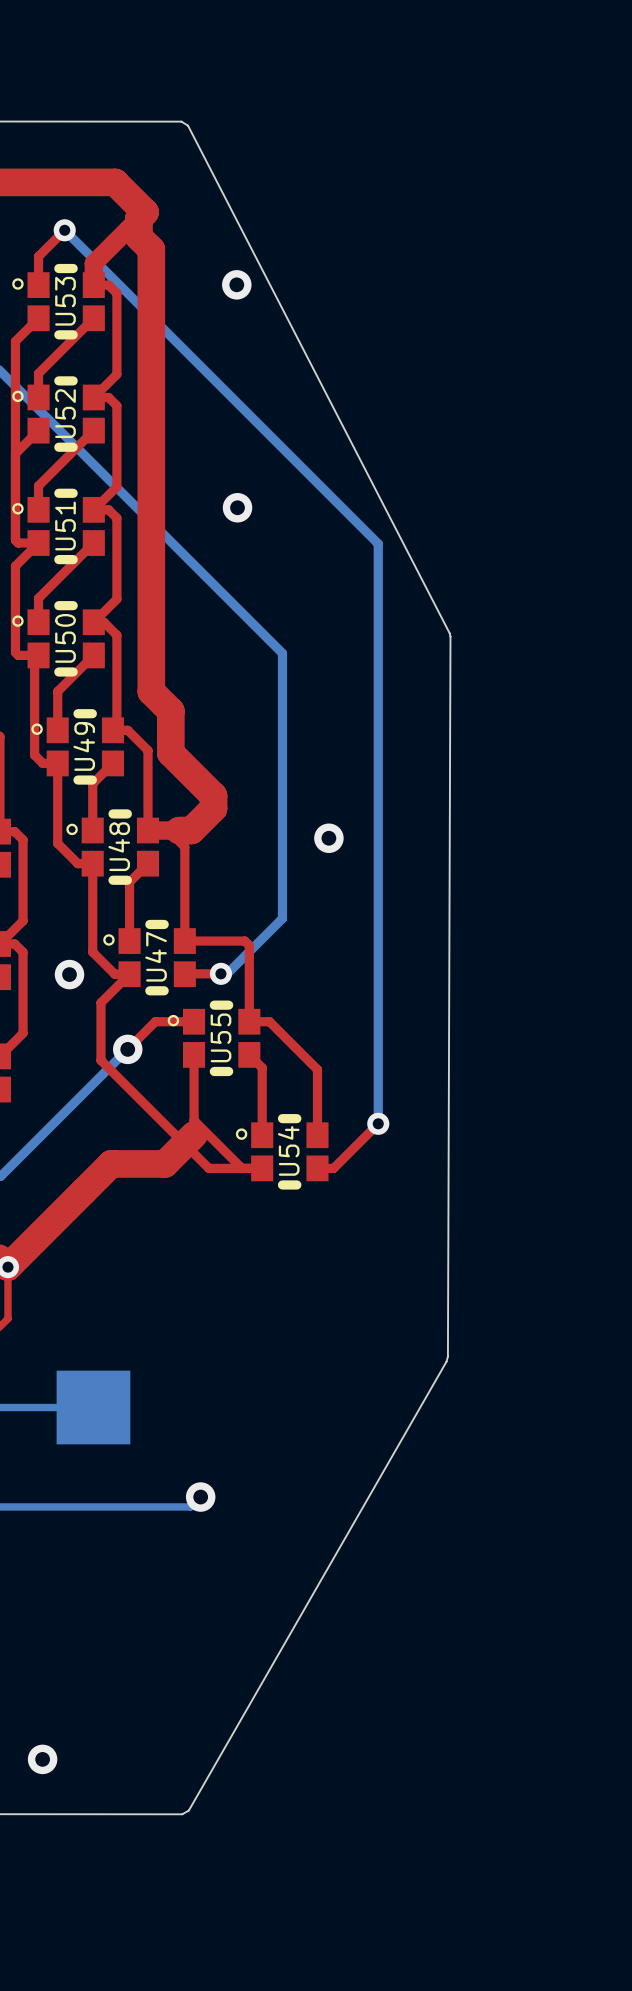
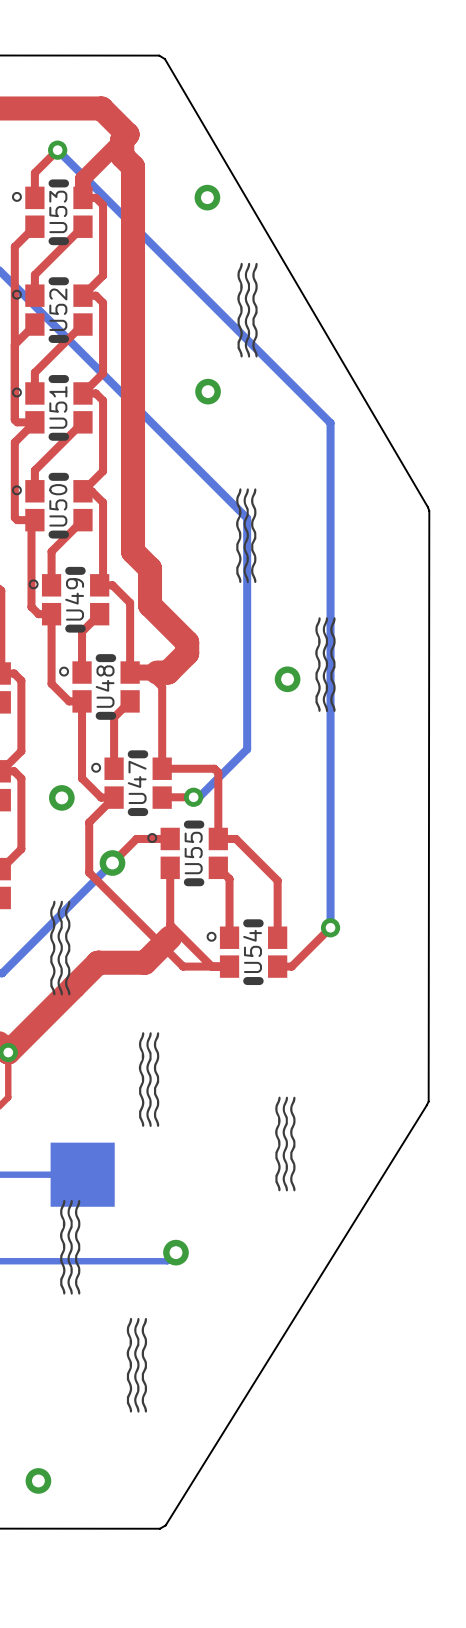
board edge: (188, 125) (450, 636) (447, 1356) (188, 1810) -> (164, 59) (429, 510) (428, 1101) (165, 1525)
drawing: none -> [237, 262, 258, 358]
drawing: none -> [236, 488, 257, 584]
drawing: none -> [315, 617, 336, 713]
drawing: none -> [50, 900, 71, 996]
drawing: none -> [138, 1032, 160, 1127]
drawing: none -> [275, 1096, 296, 1192]
drawing: none -> [60, 1199, 81, 1295]
drawing: none -> [126, 1317, 148, 1413]

